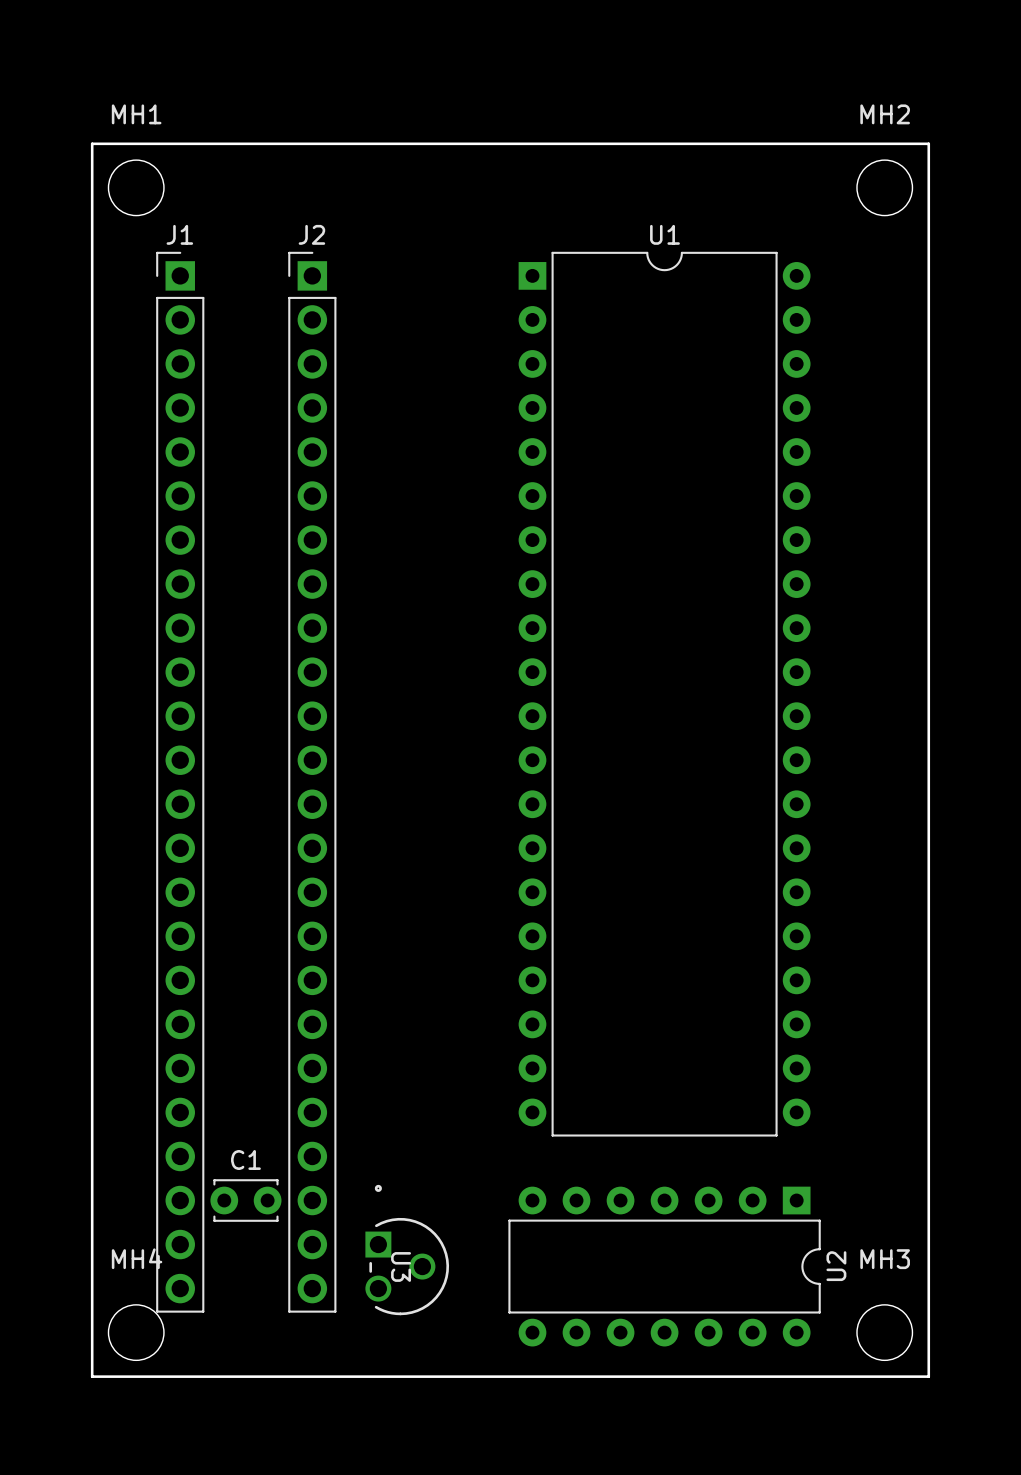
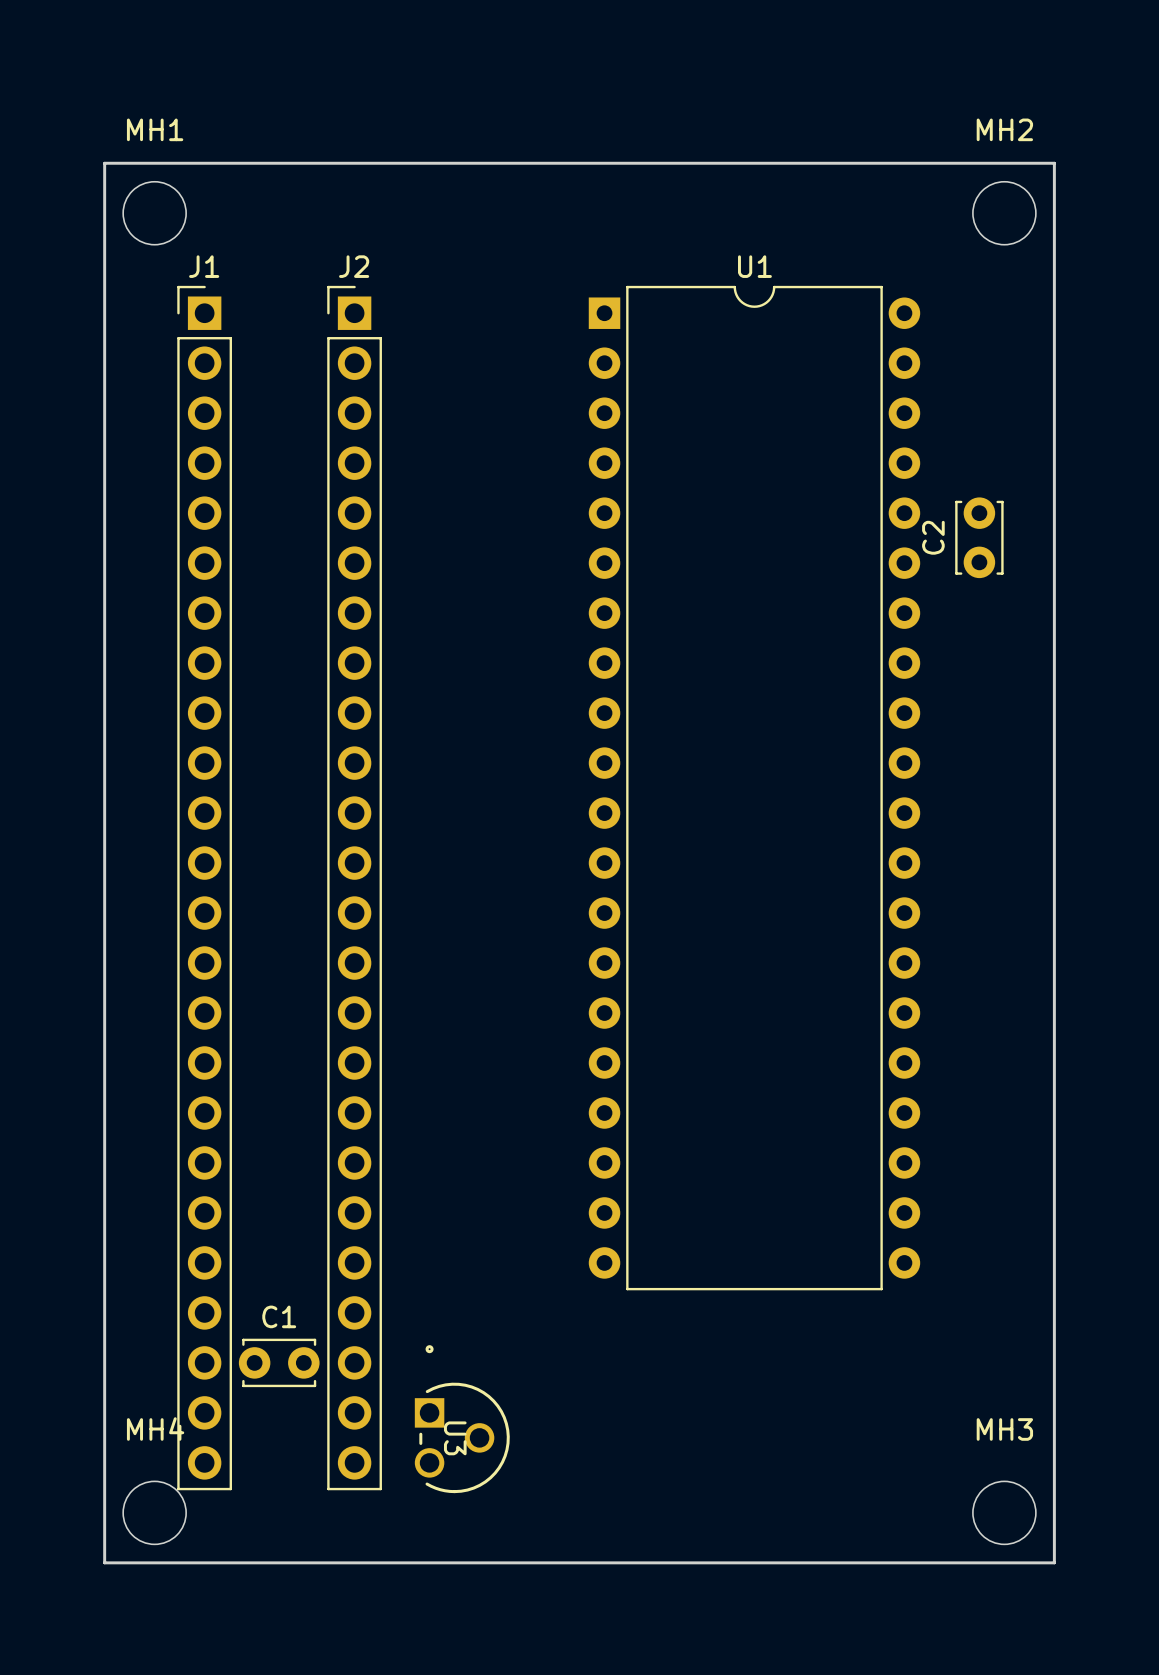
C2: none -> (979, 537)
U2: (664, 1266) -> none

